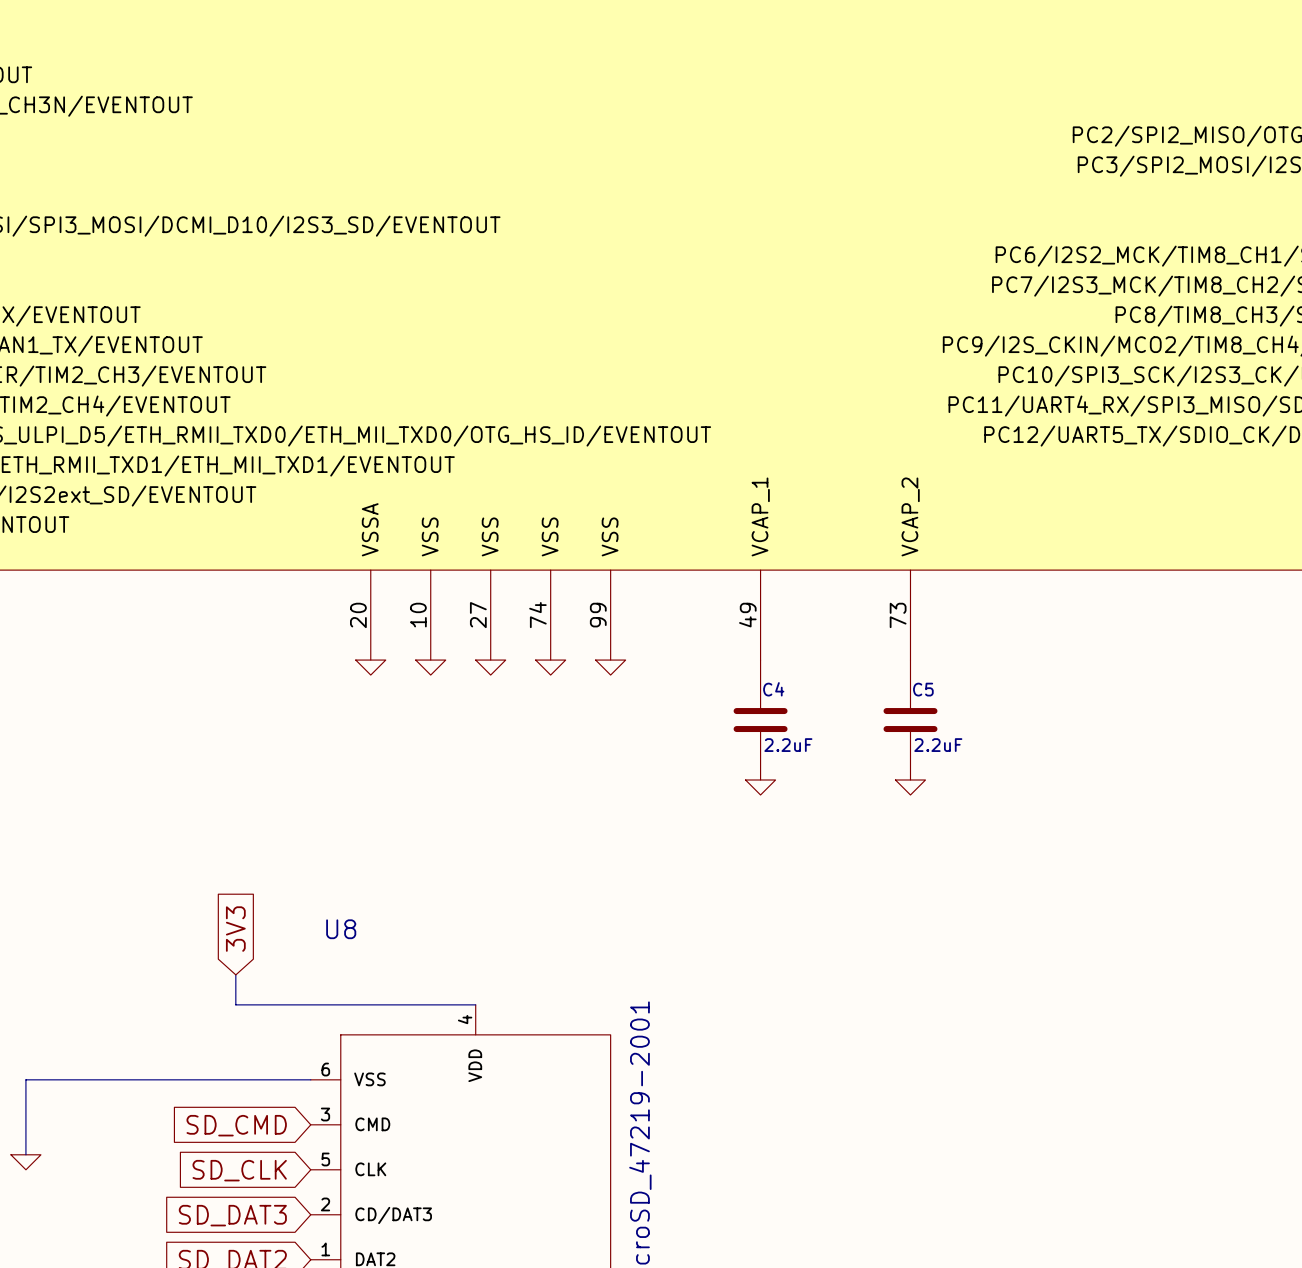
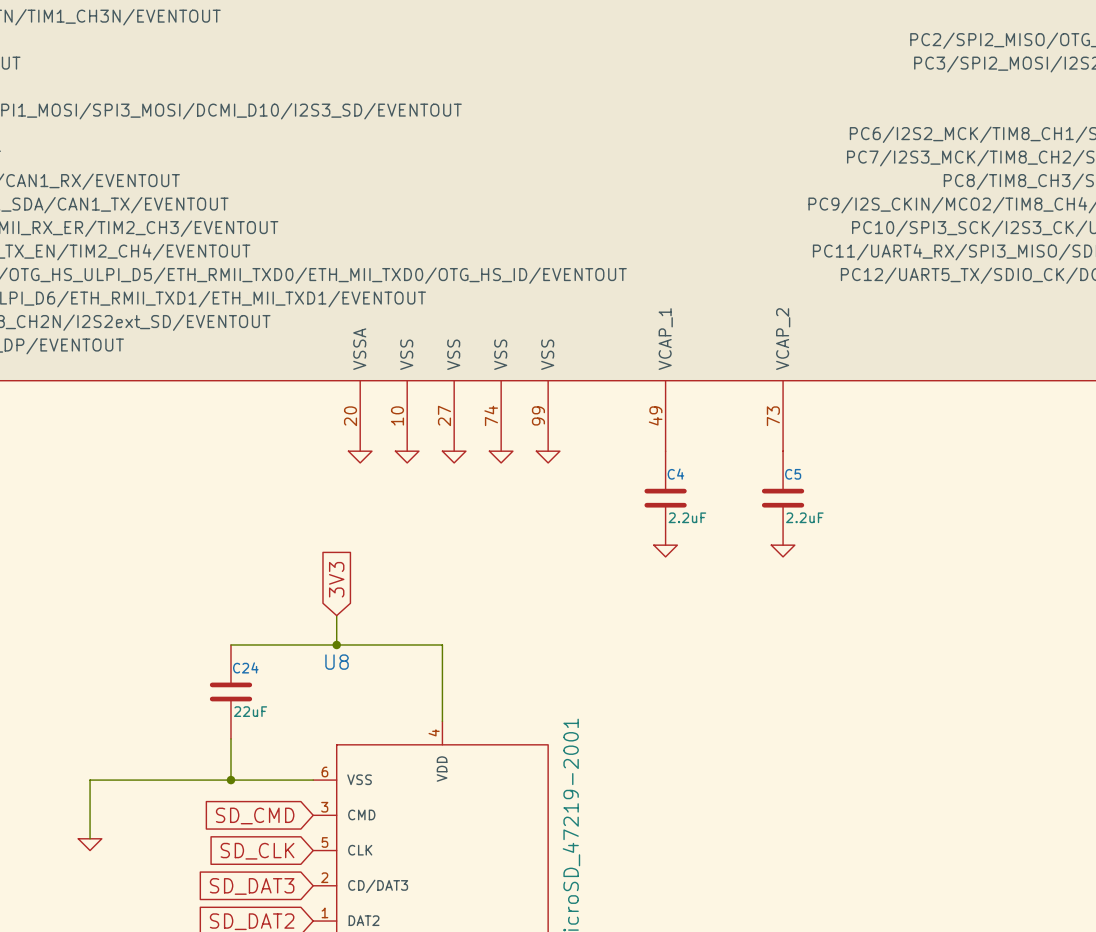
wire: none -> (336, 615) (336, 644)
junction: none -> (336, 644)
global label position: 3V3 (235, 929) -> 3V3 (336, 579)
C24: none -> 22uF (230, 691)
wire: (235, 974) (235, 1004) (475, 1004) -> (230, 644) (442, 644) (442, 721)
wire: none -> (230, 738) (230, 780)
junction: none -> (230, 780)

